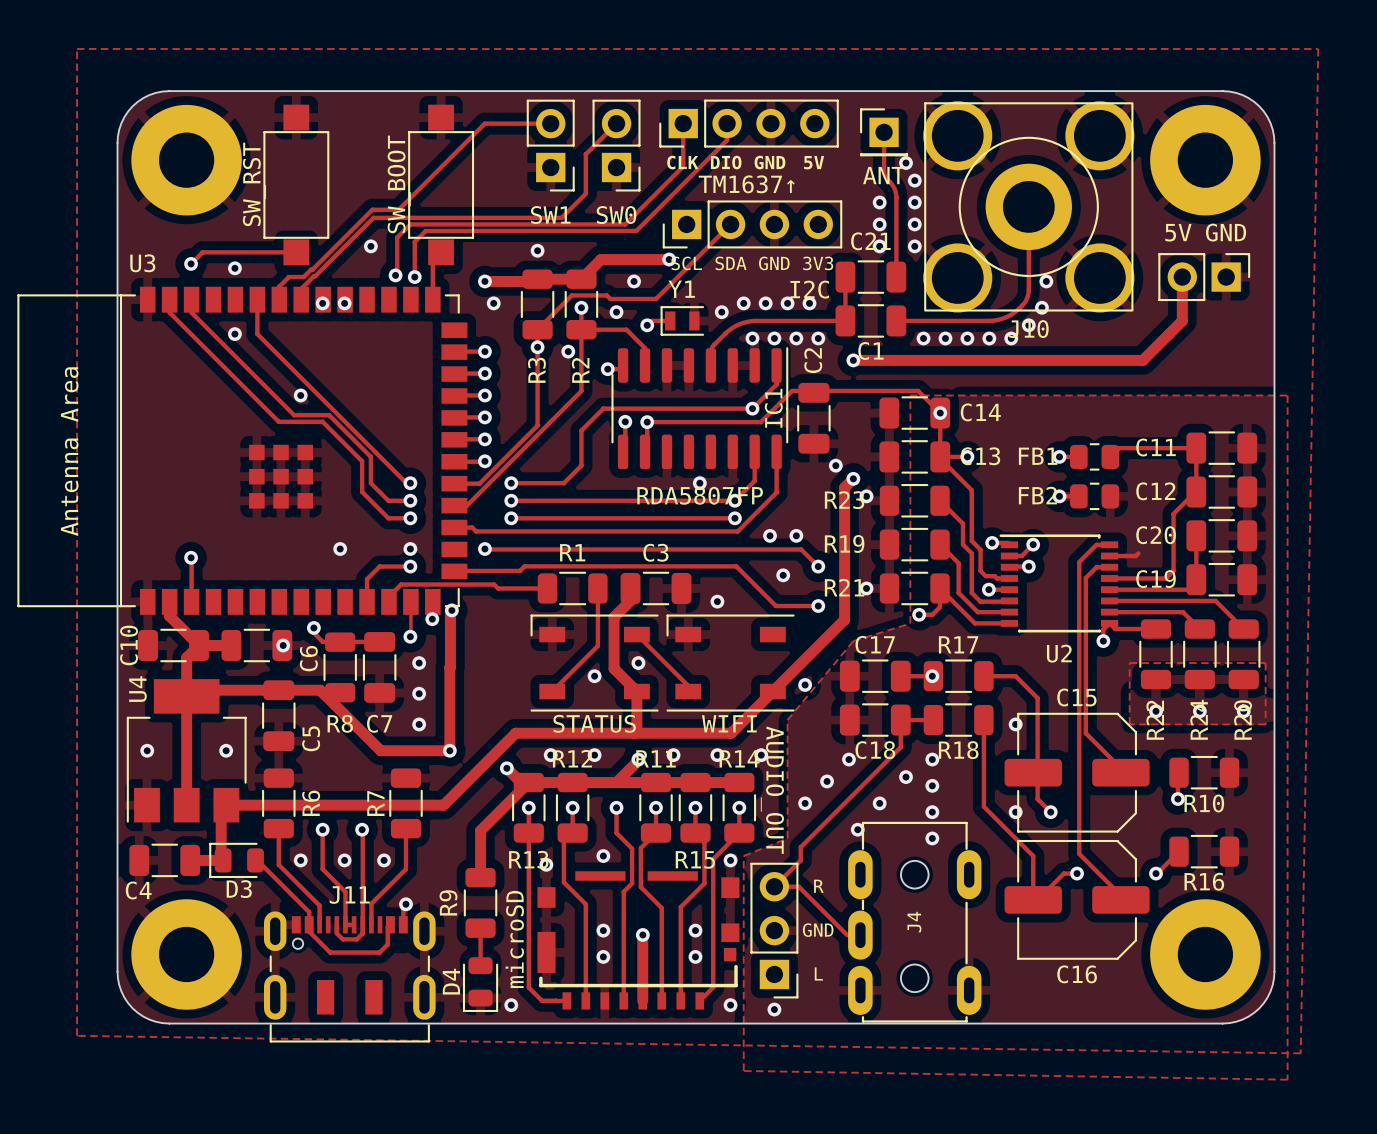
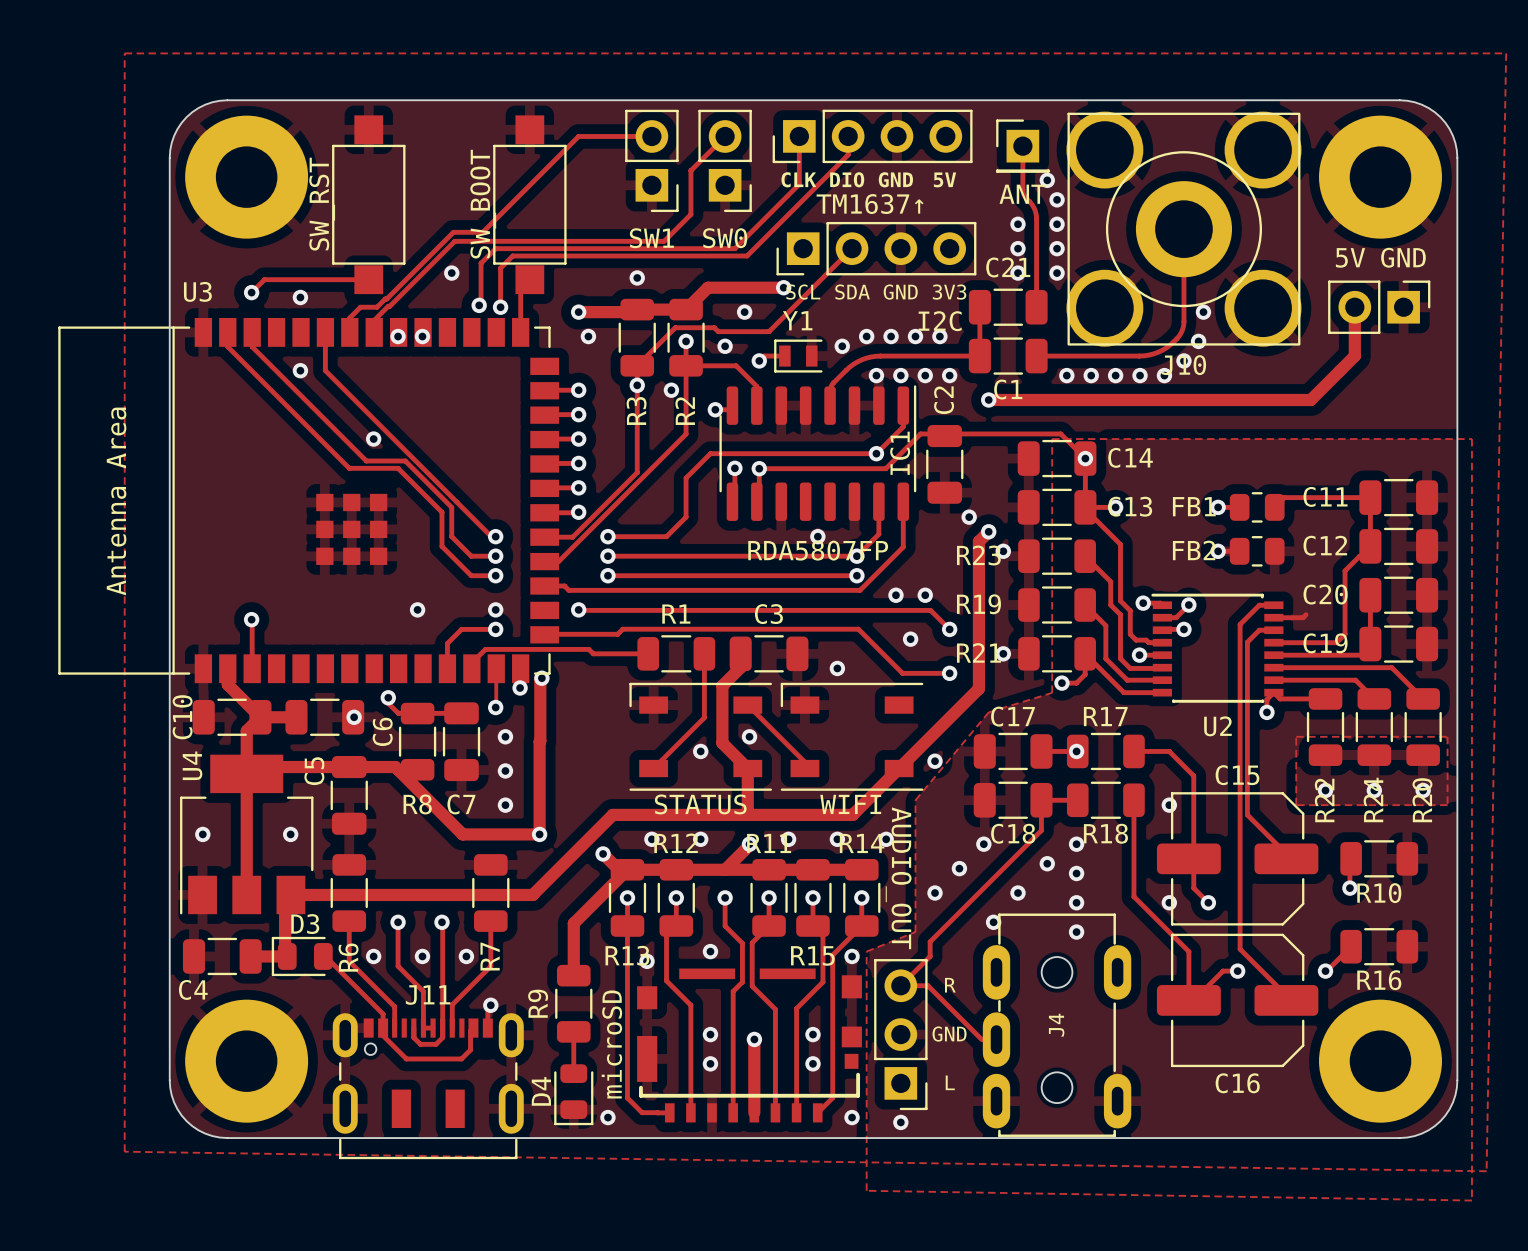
C5 name position: C5 (311, 738) -> C5 (314, 771)
R6 name position: R6 (311, 803) -> R6 (348, 957)
R7 name position: R7 (375, 803) -> R7 (490, 956)
D3 name position: D3 (239, 889) -> D3 (305, 924)

